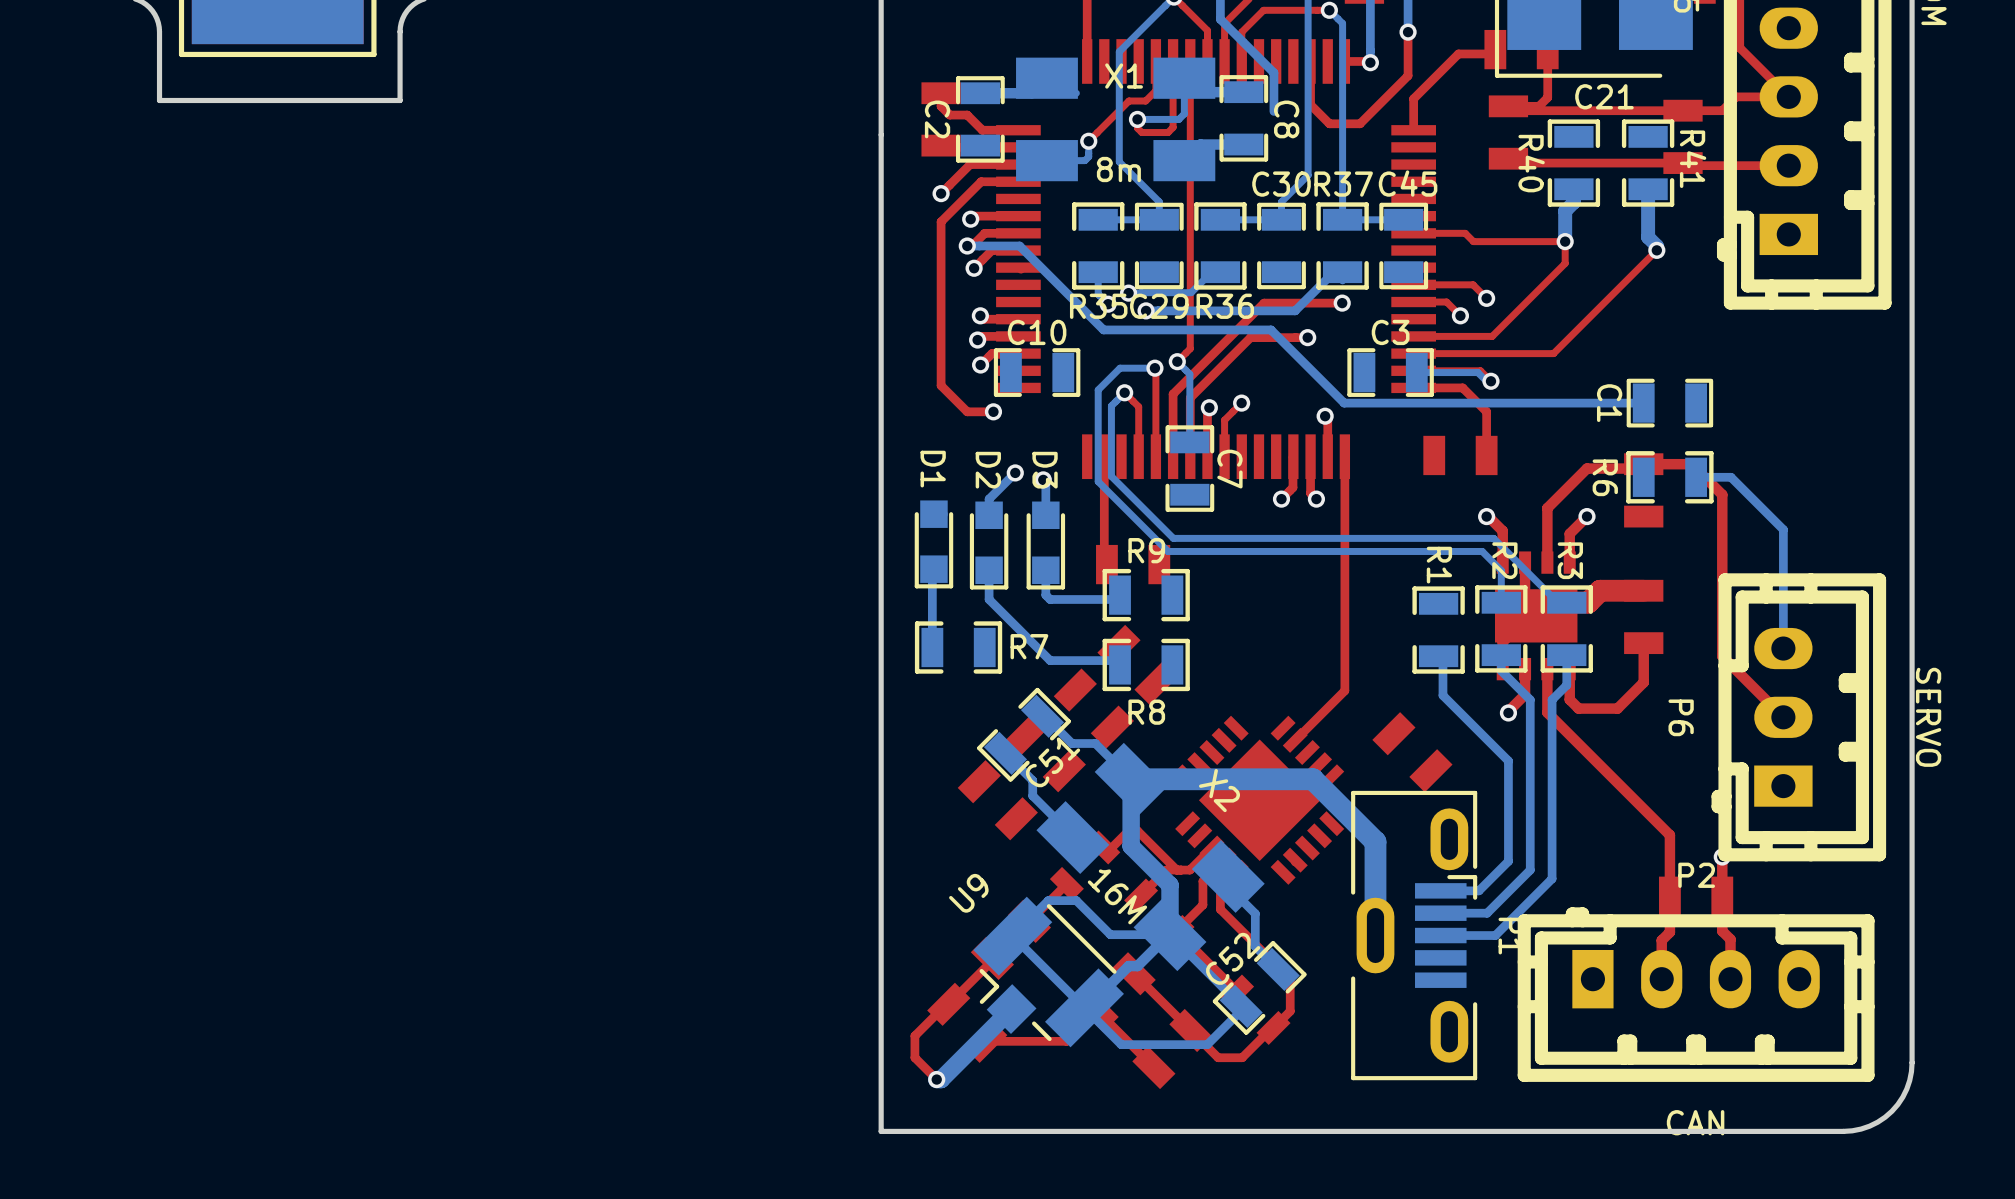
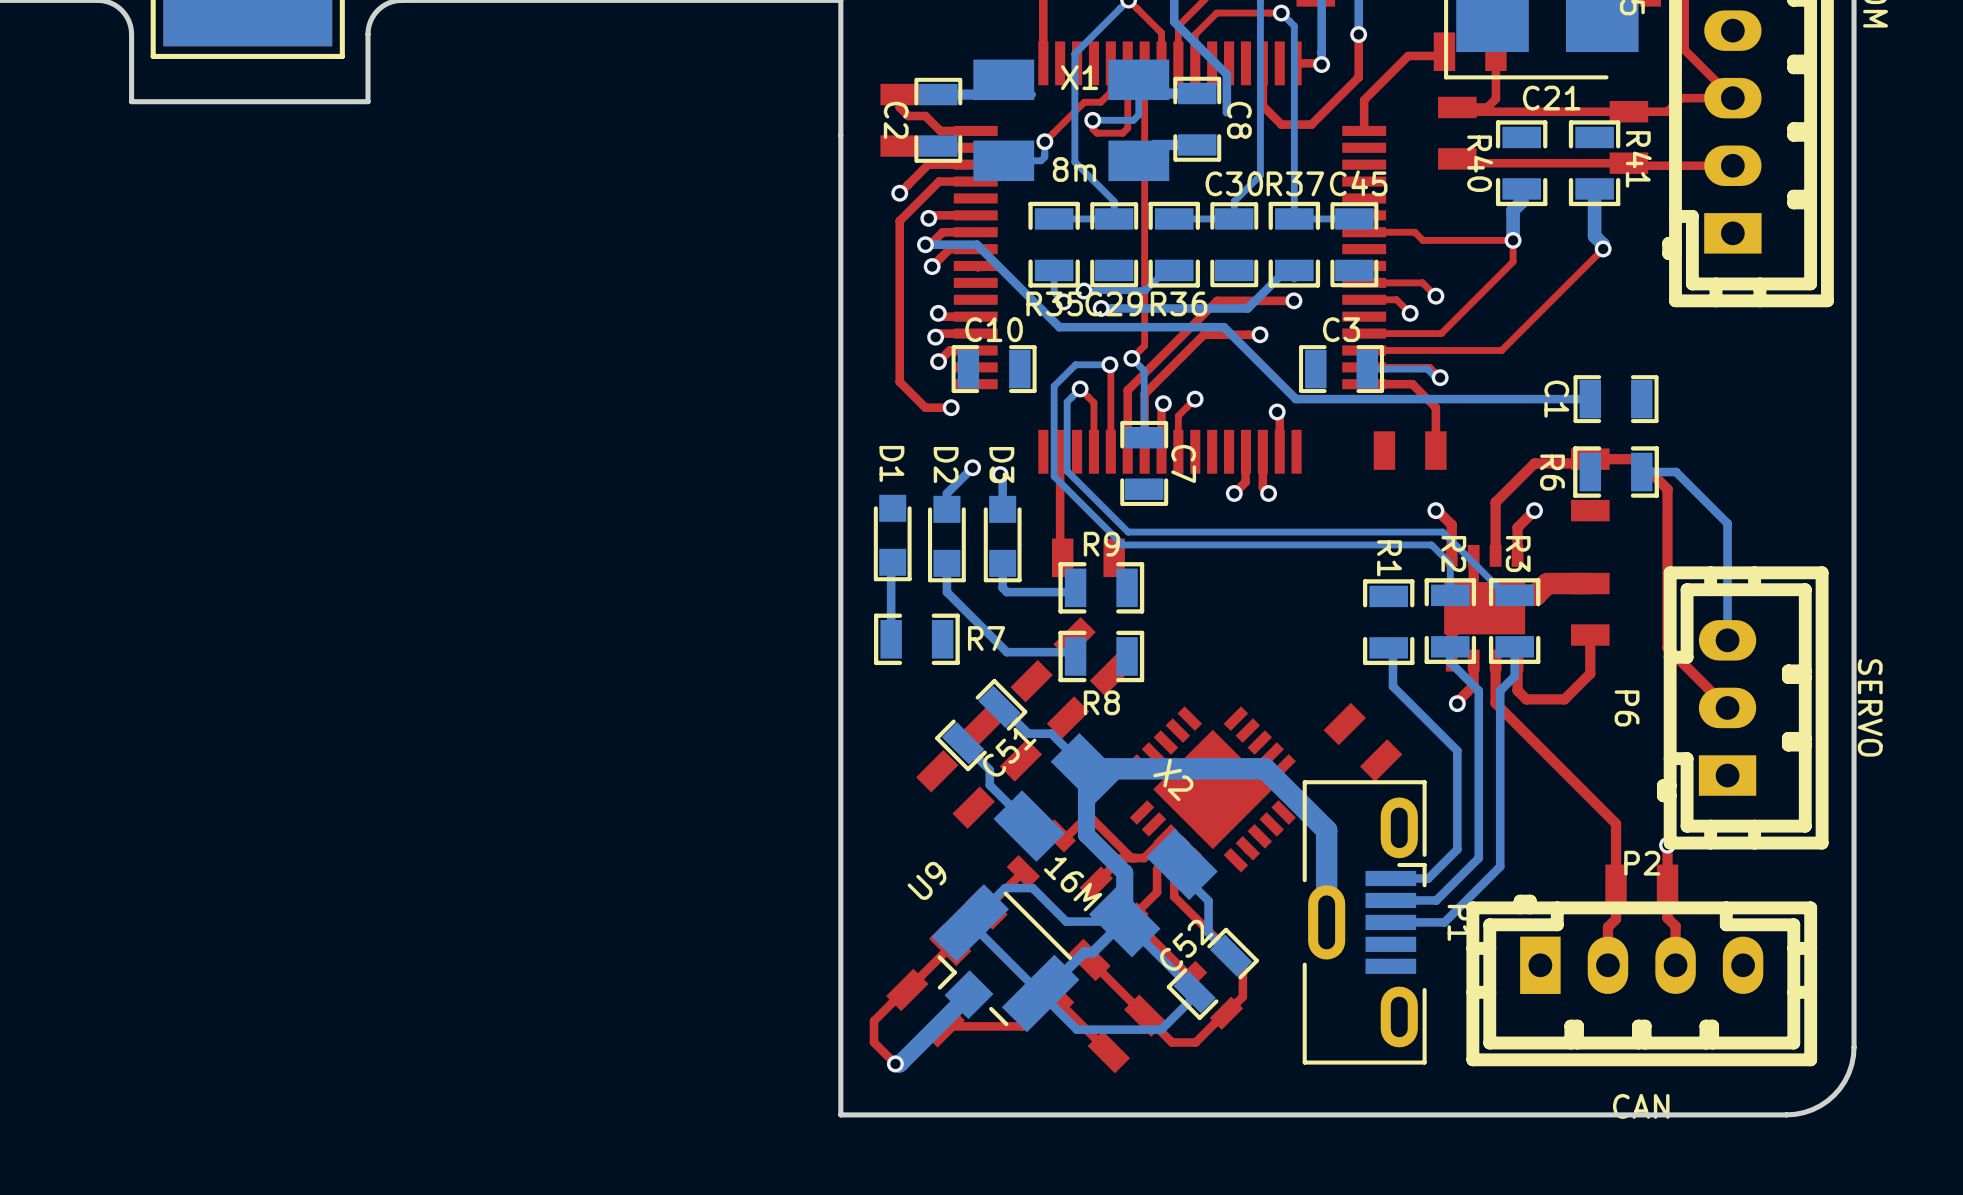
top track: (1344, 456) (1344, 690) (1295, 740) -> none

